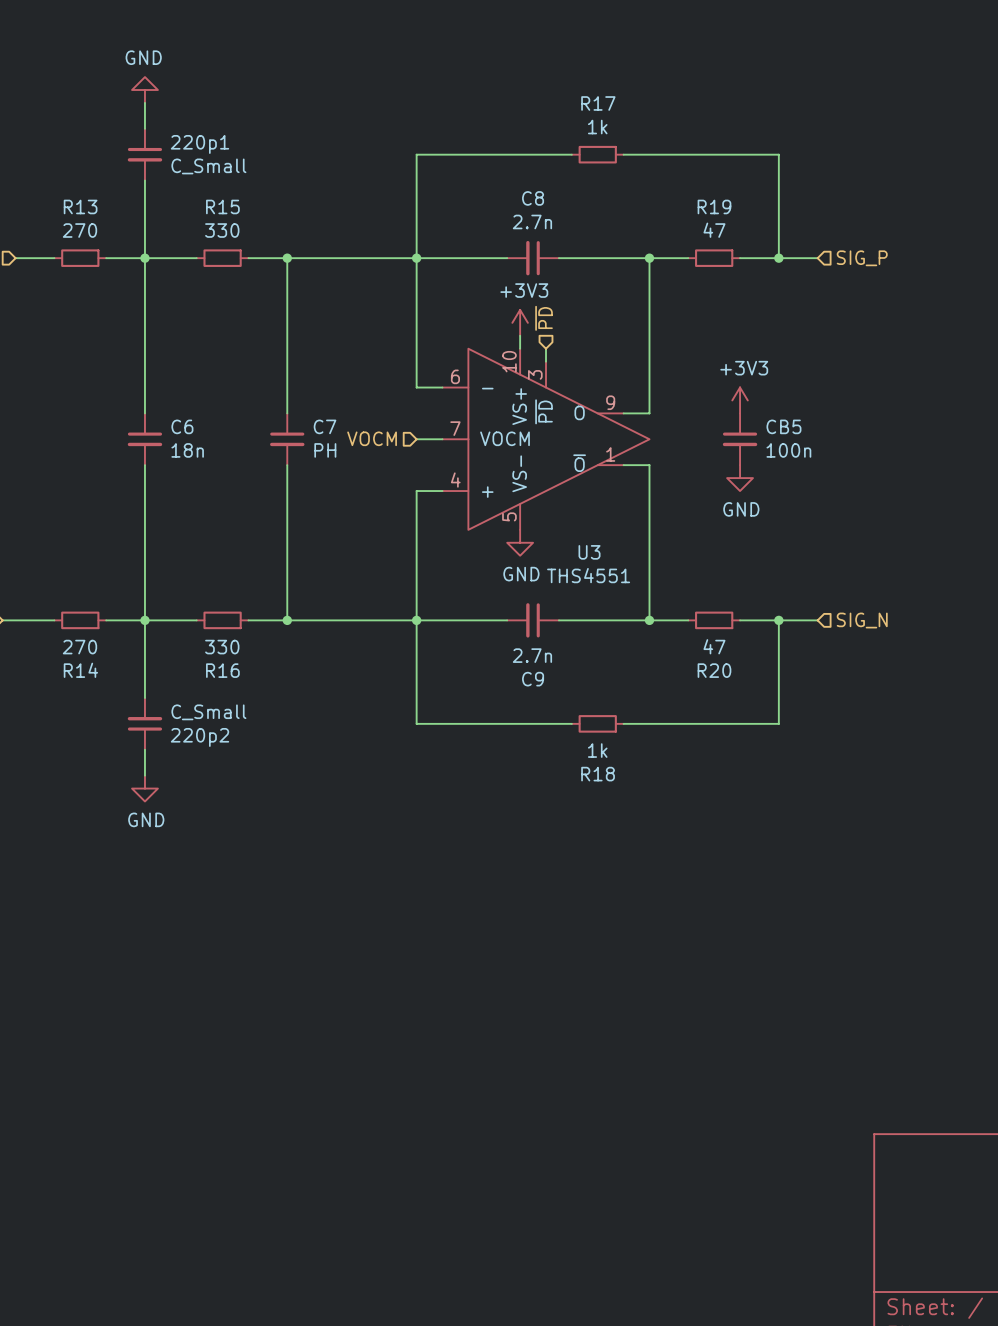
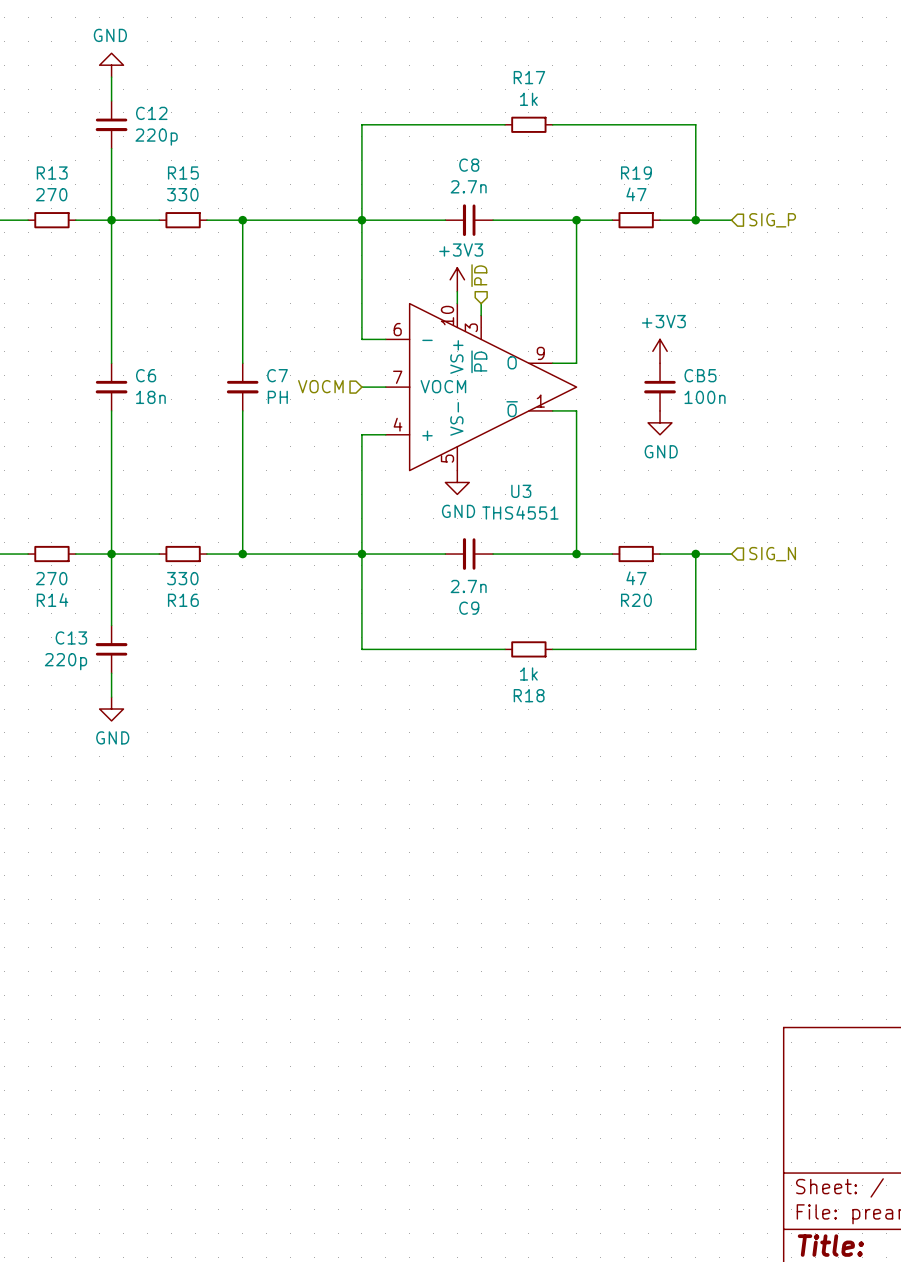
220p1 name: 220p1 (199, 144) -> C12 (151, 113)
220p1 value: C_Small (208, 166) -> 220p (156, 137)
220p2 value: C_Small (208, 712) -> 220p (65, 661)
220p2 name: 220p2 (199, 737) -> C13 (71, 637)

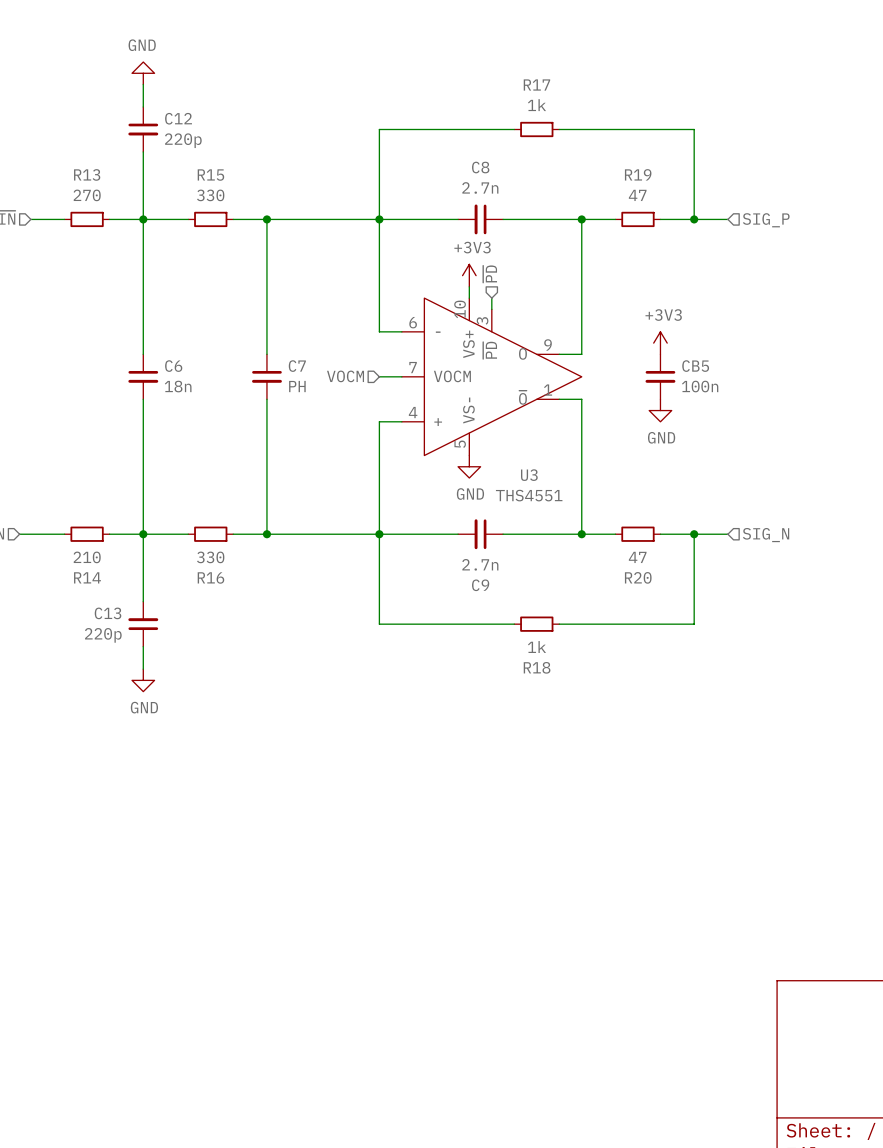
R14 value: 270 (51, 578) -> 210 (87, 557)

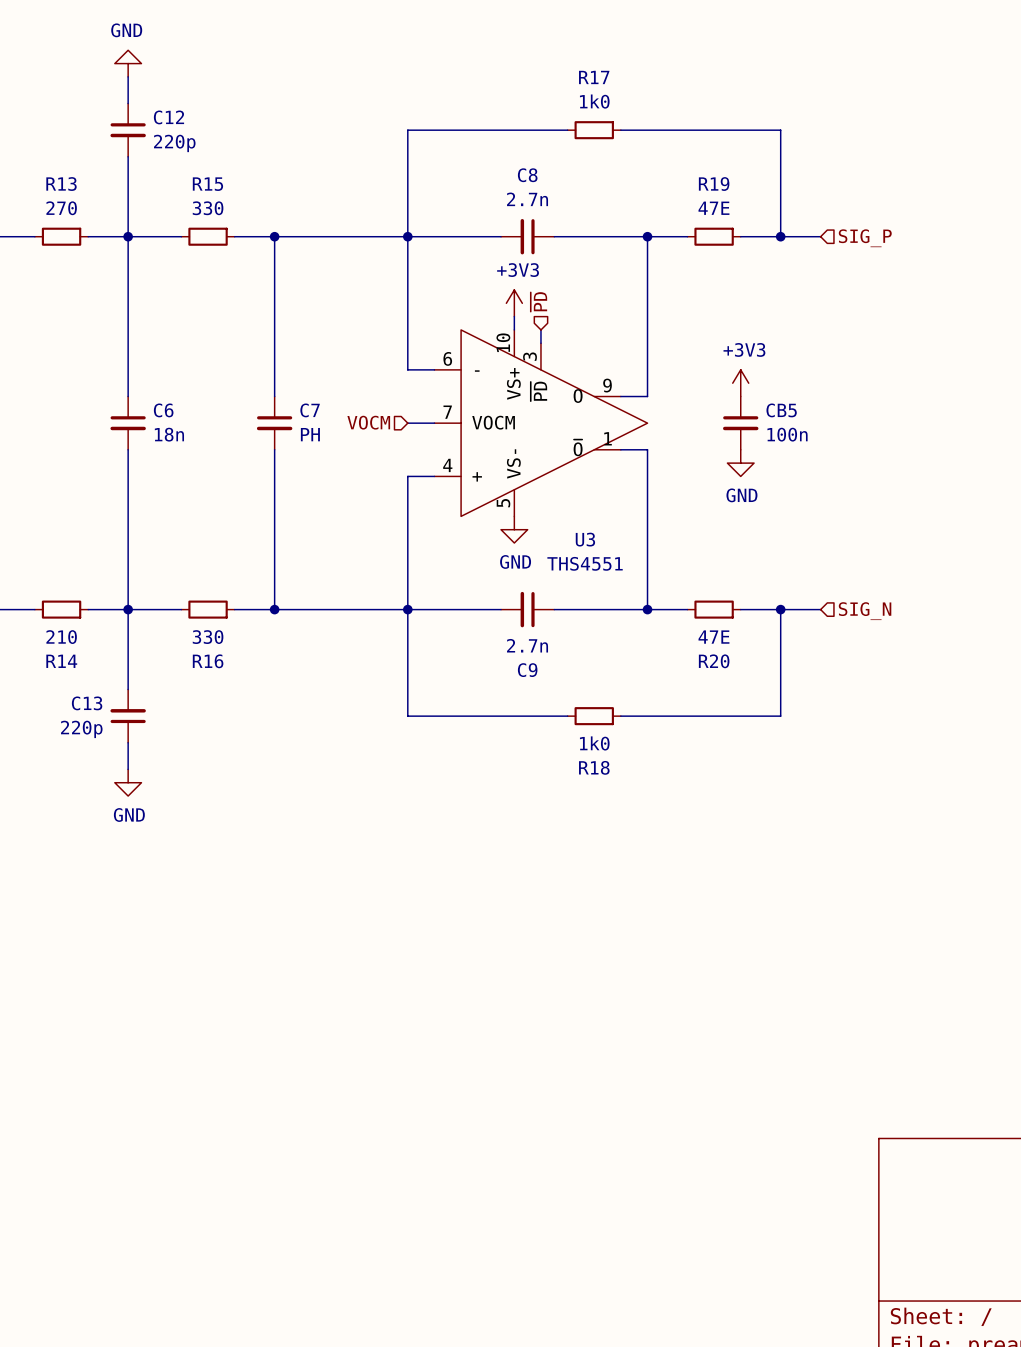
R17 value: 1k (537, 105) -> 1k0 (594, 101)
R19 value: 47 (637, 195) -> 47E (713, 208)
R20 value: 47 (637, 557) -> 47E (713, 637)
R18 value: 1k (537, 647) -> 1k0 (594, 743)

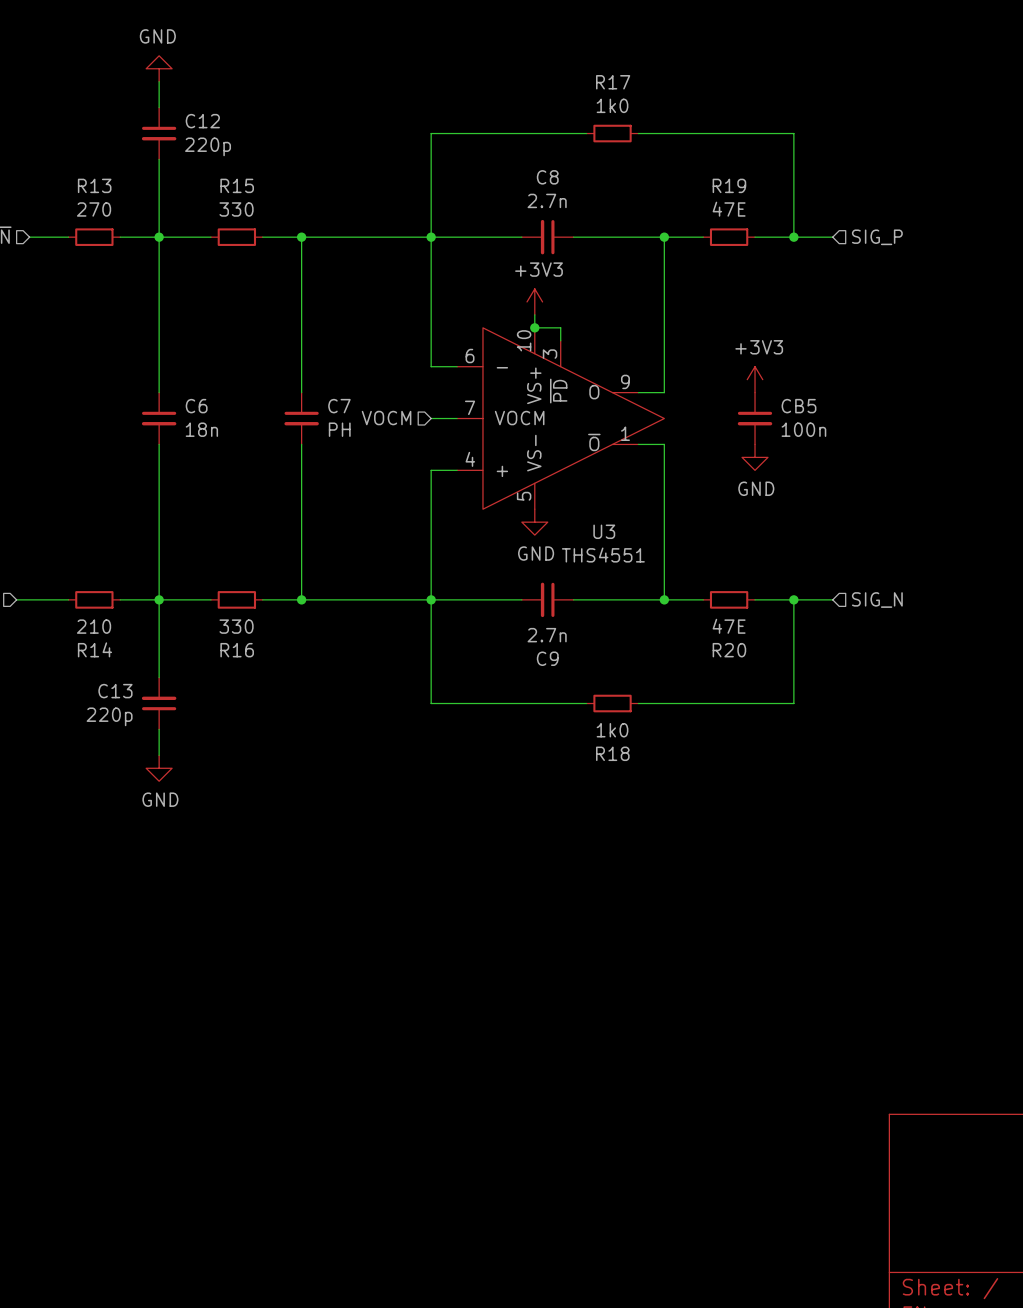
hierarchical label: ~{PD} (538, 301) -> none
wire: none -> (534, 327) (560, 327)
junction: none -> (534, 327)

